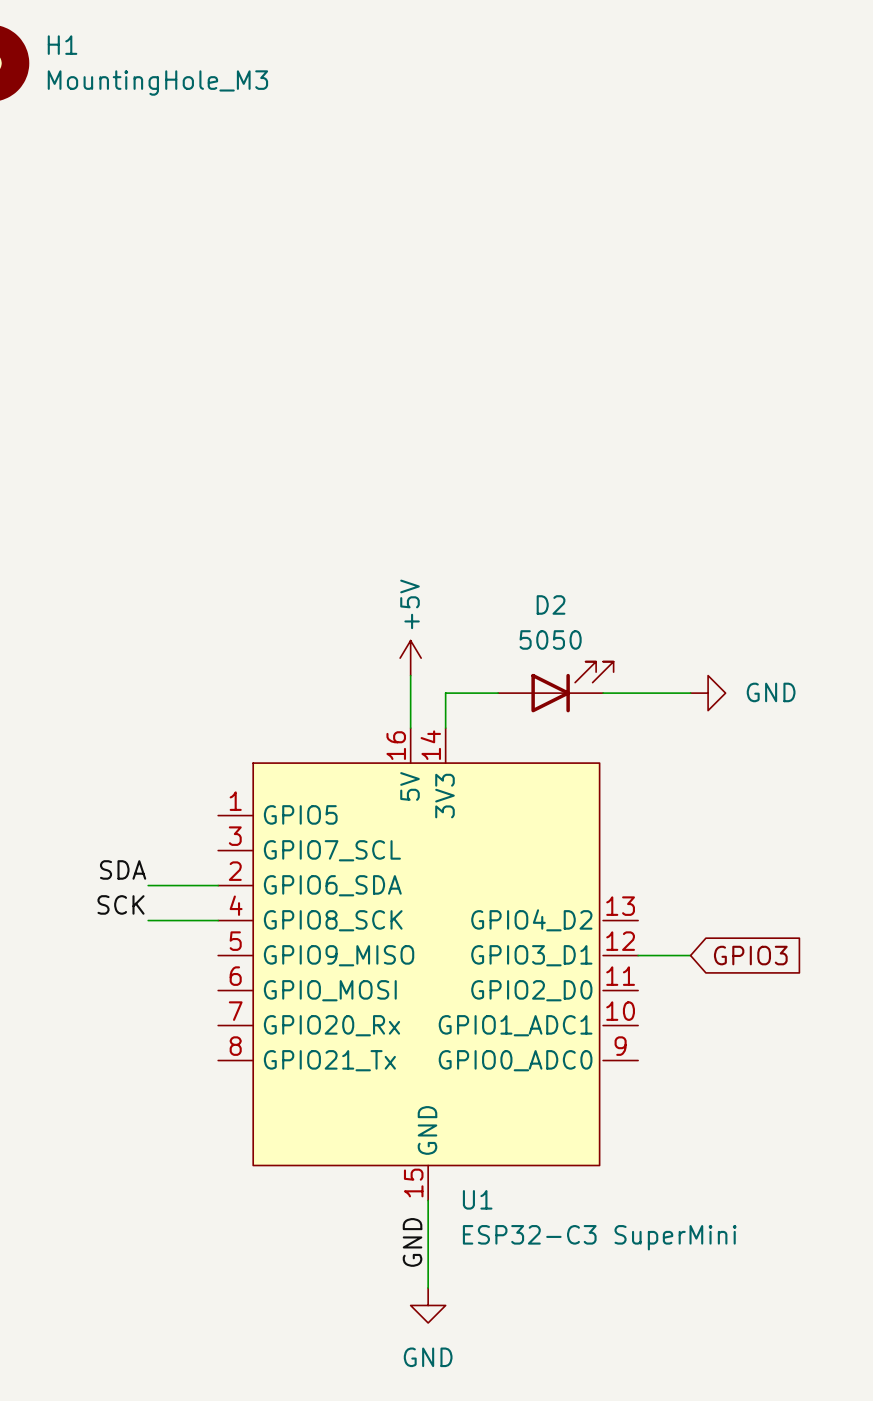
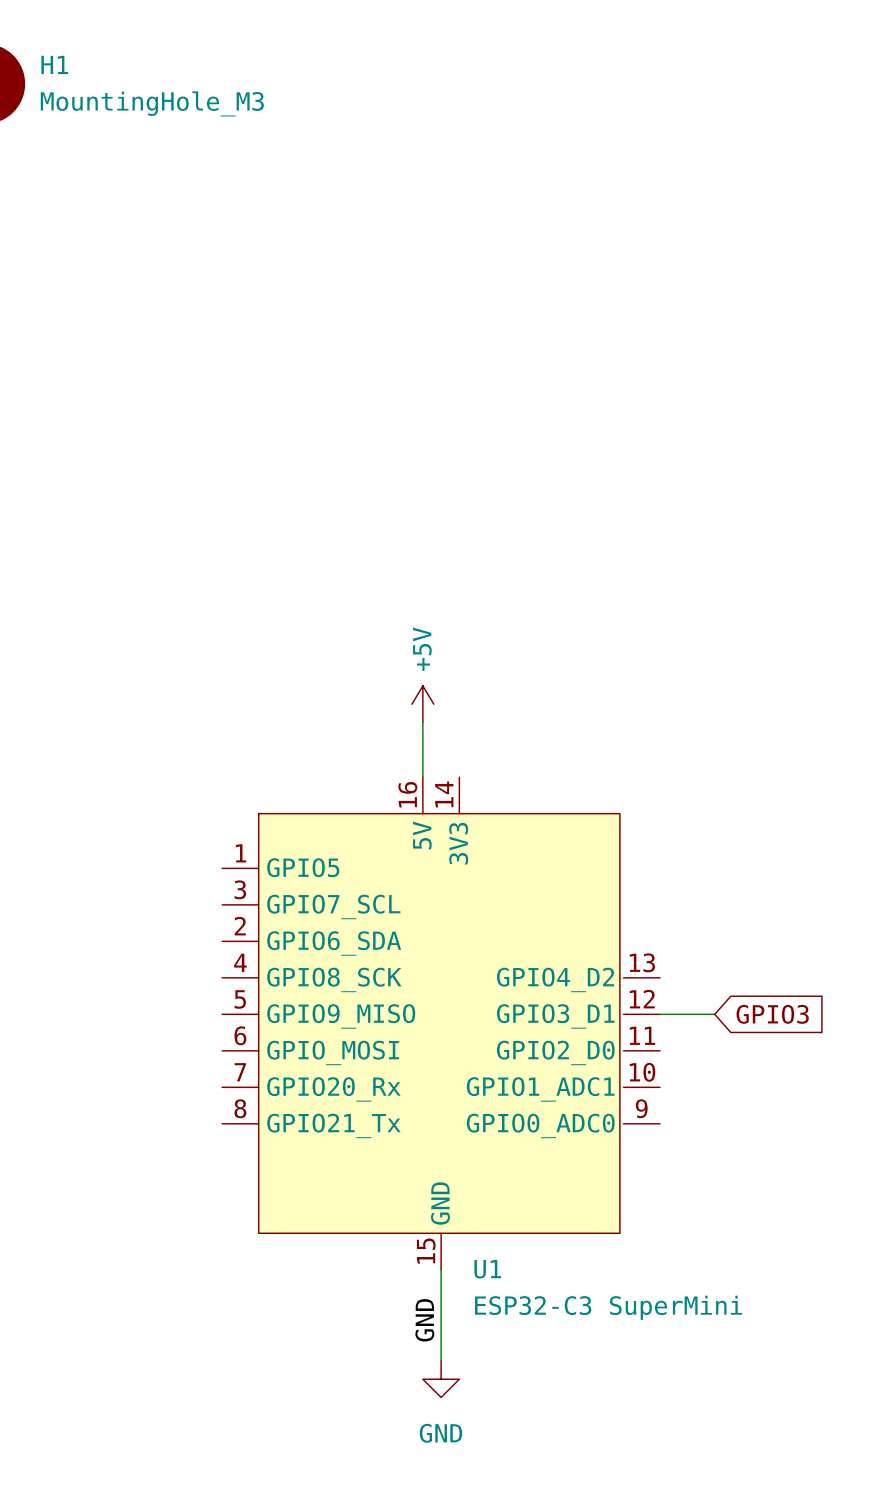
D2: 5050 (555, 686) -> none
wire: (498, 693) (445, 693) (445, 728) -> none
wire: (603, 693) (690, 693) -> none
power symbol: GND (708, 693) -> none
label: SDA (123, 869) -> none
wire: (148, 885) (218, 885) -> none
label: SCK (121, 904) -> none
wire: (148, 920) (218, 920) -> none

